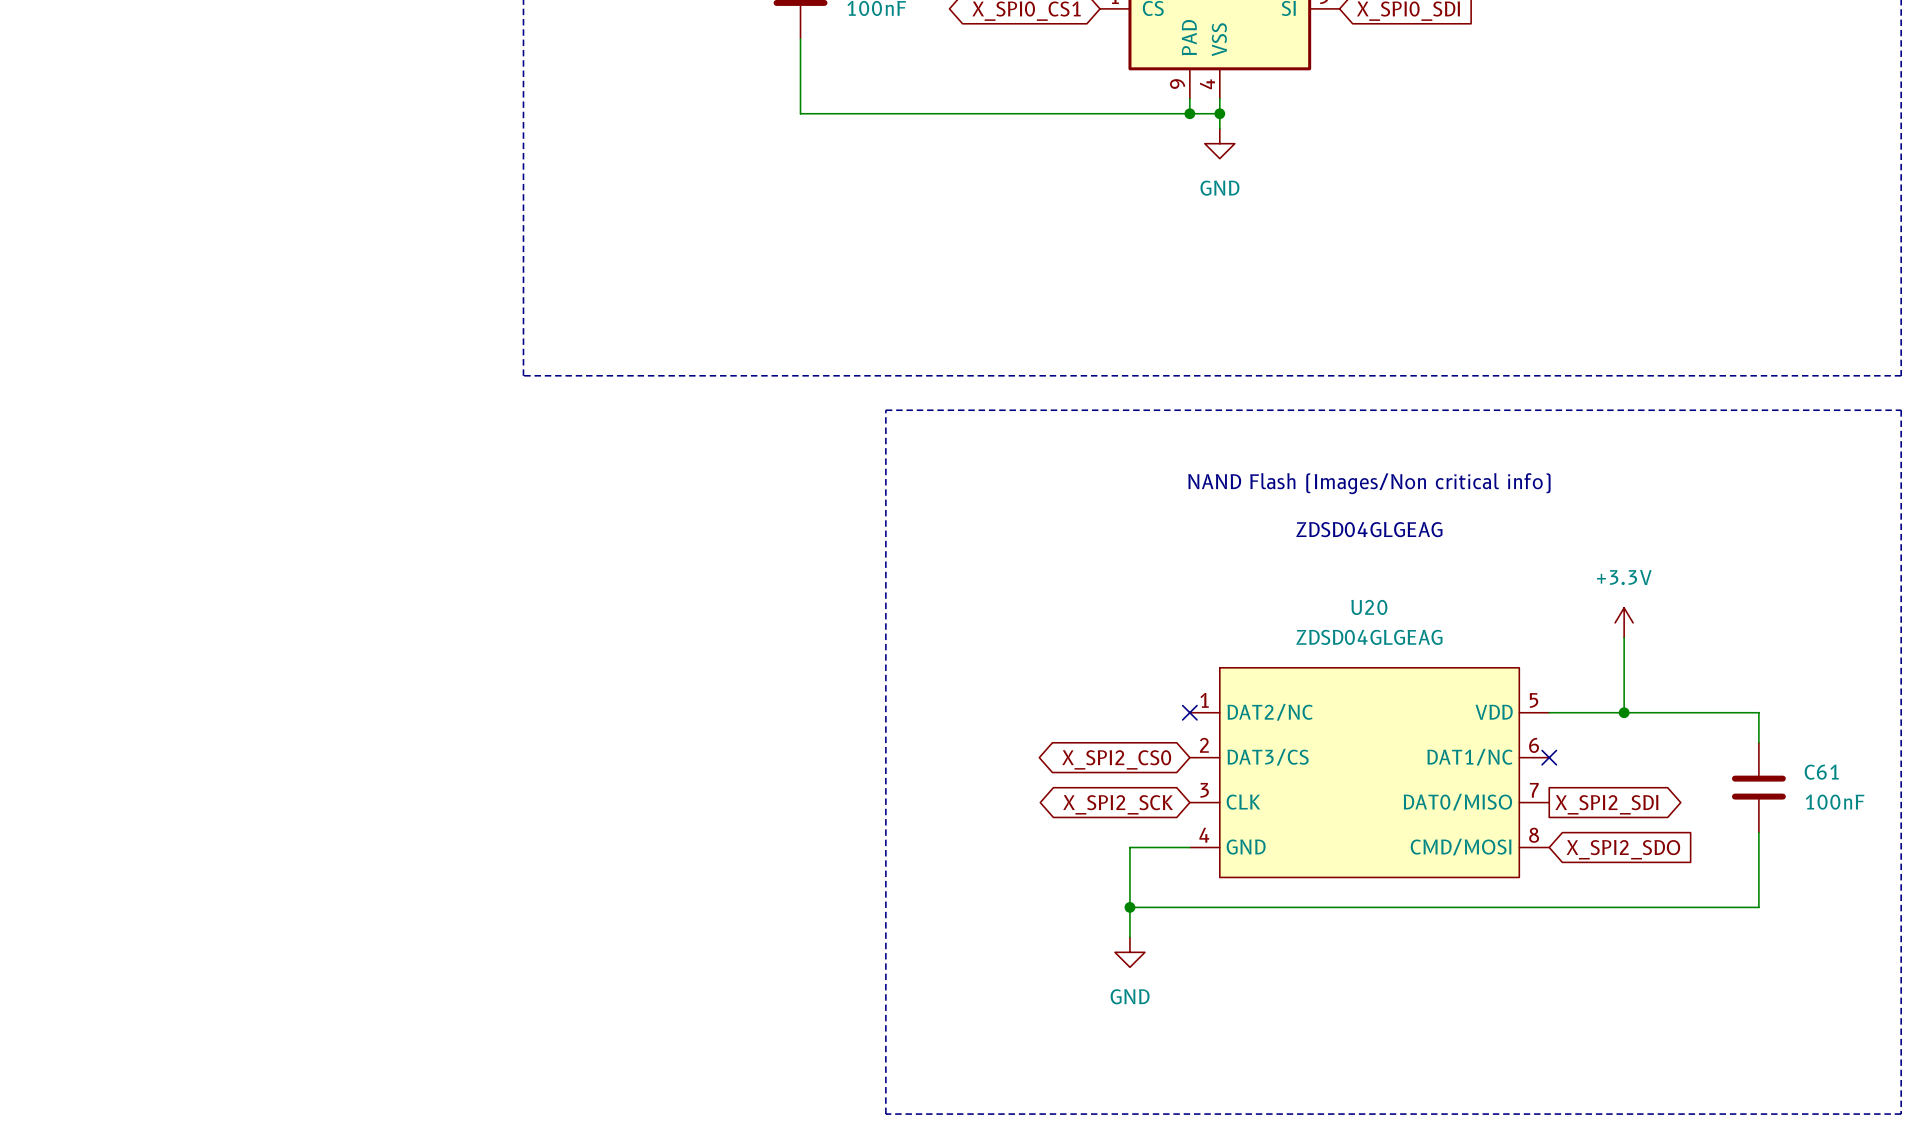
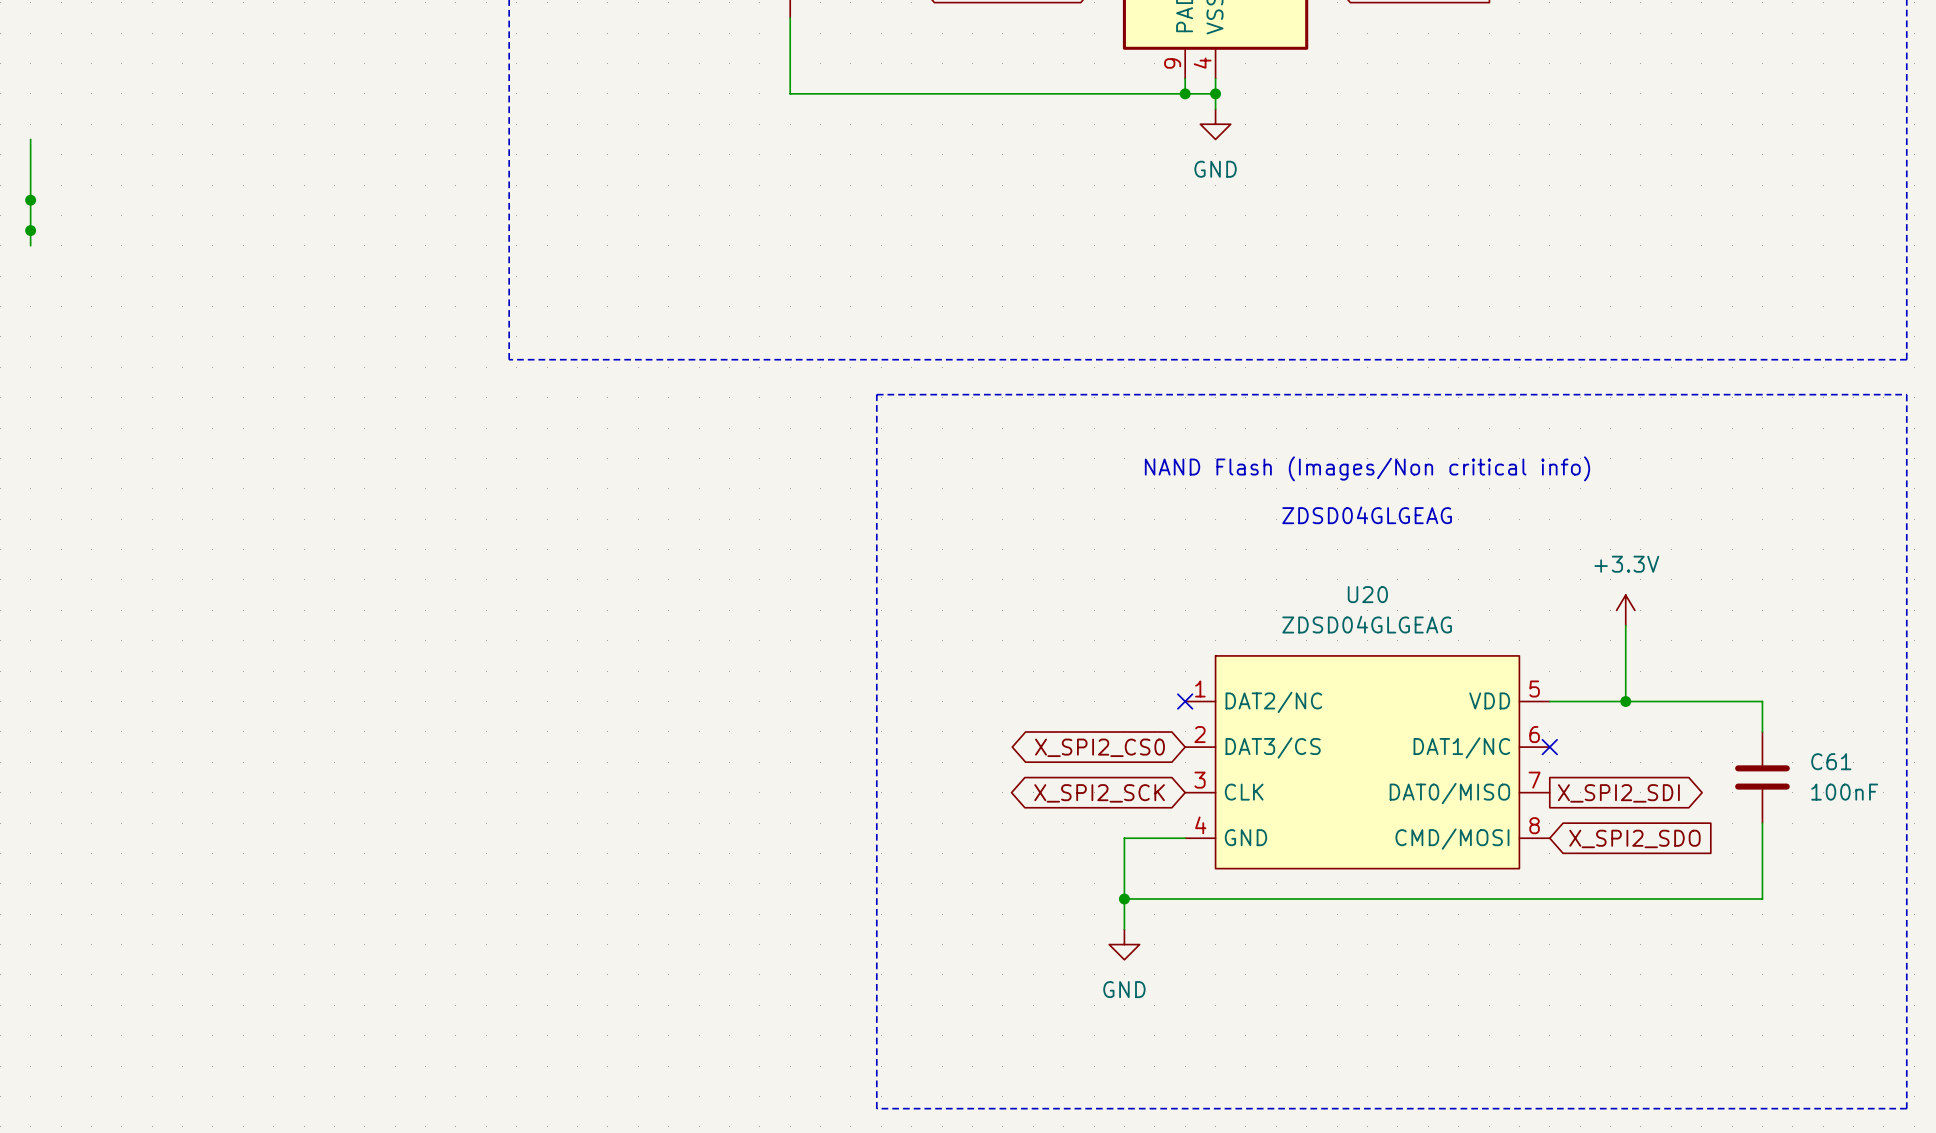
wire: none -> (30, 139) (30, 245)
junction: none -> (30, 200)
junction: none -> (30, 230)

